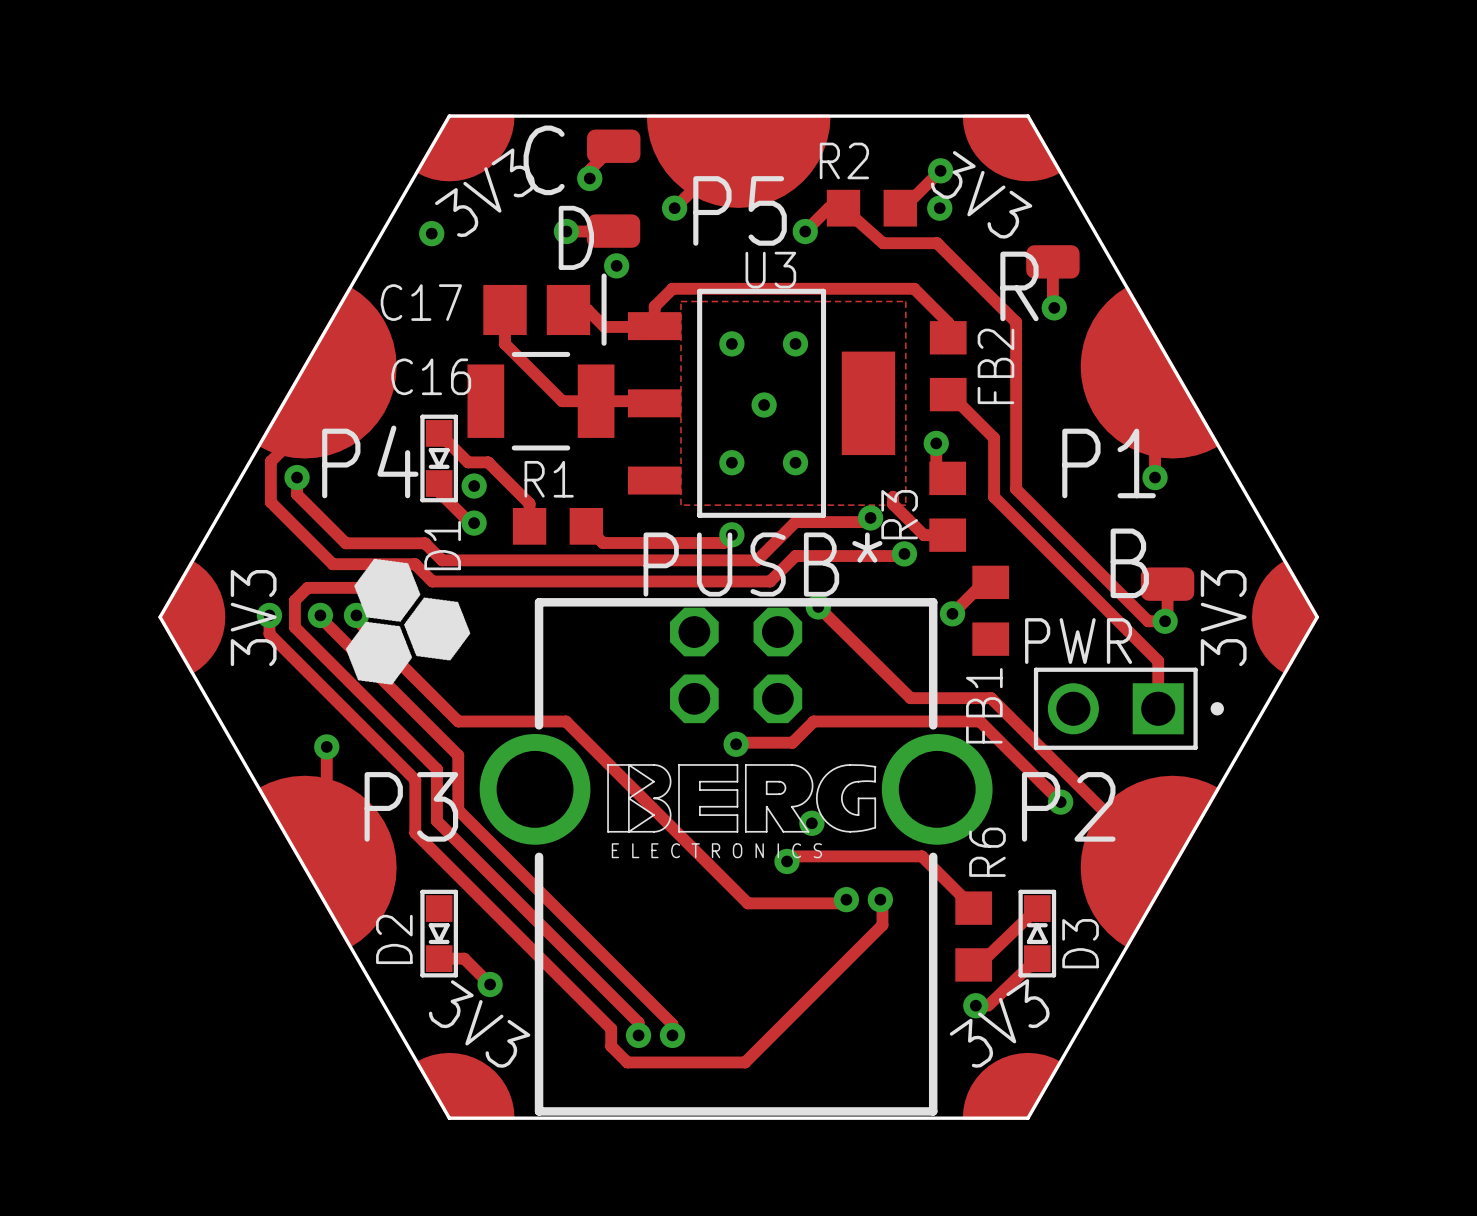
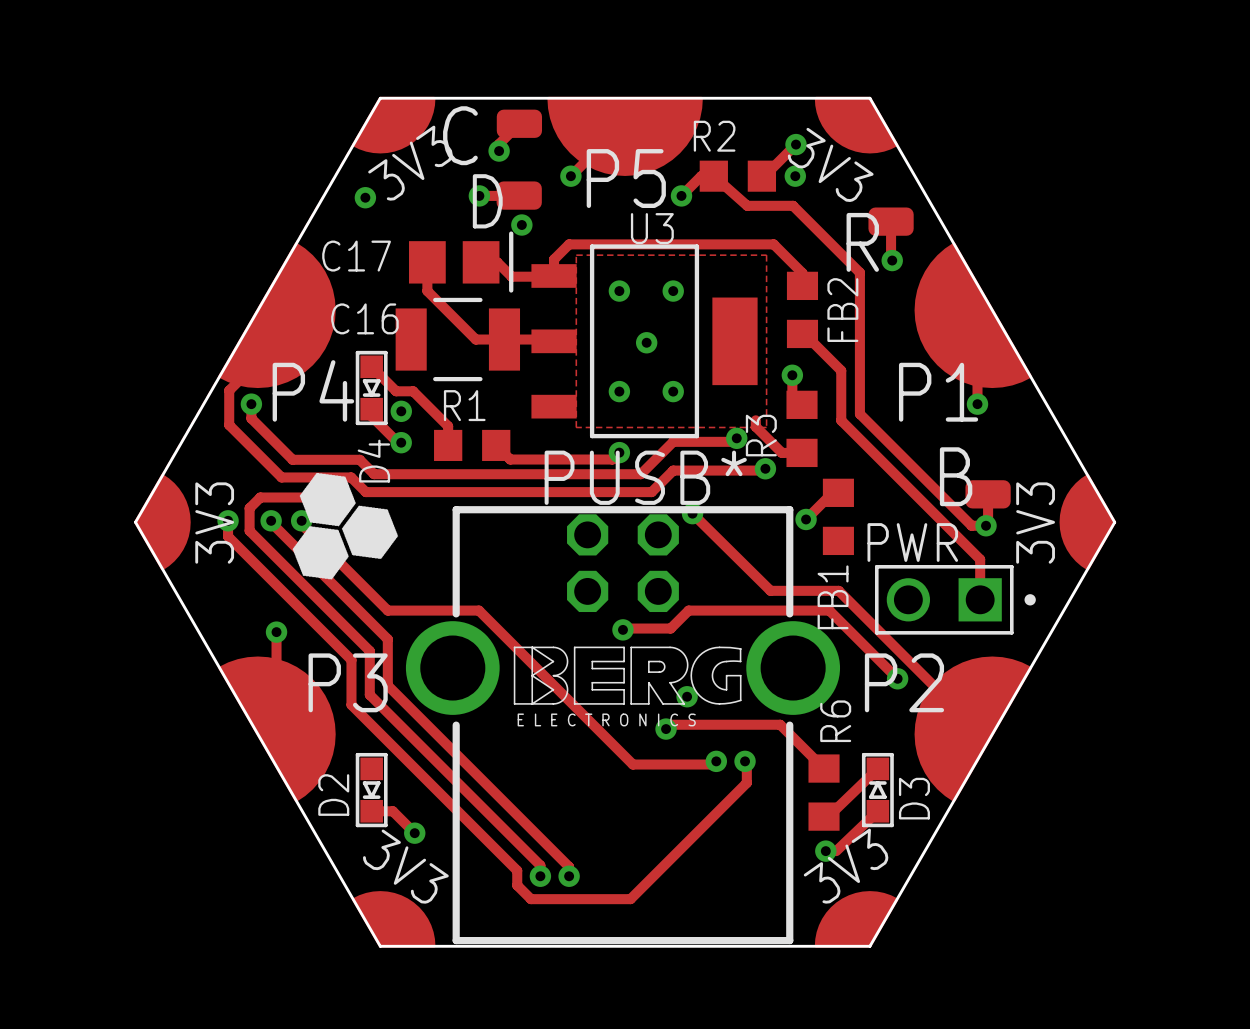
D1 name: D1 (442, 545) -> D4 (373, 461)

